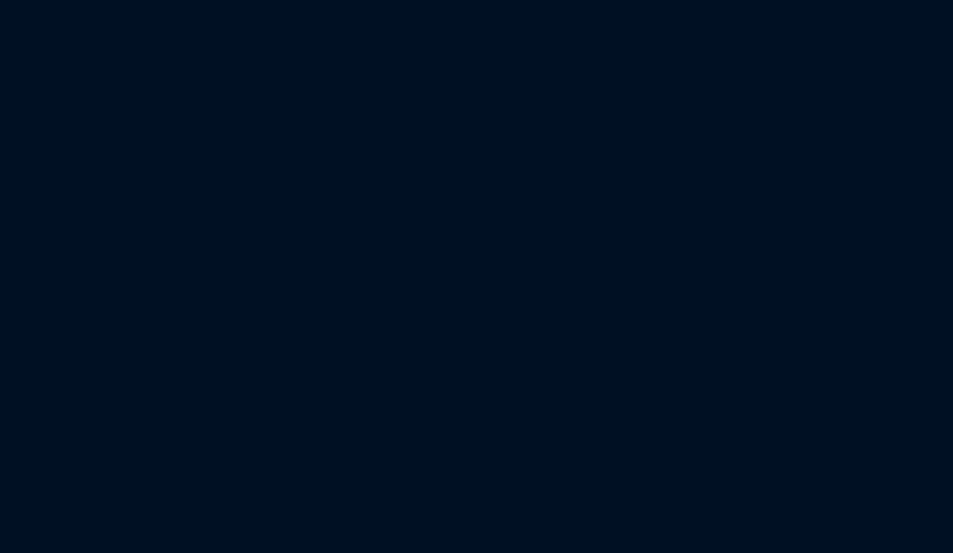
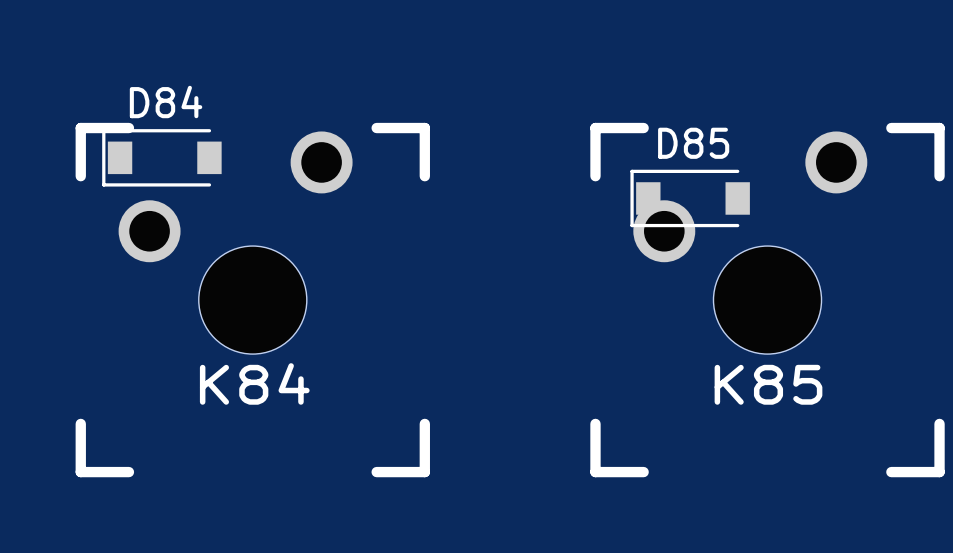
D84: none -> (161, 157)
D85: none -> (690, 198)
K84: none -> (252, 300)
K85: none -> (767, 300)

